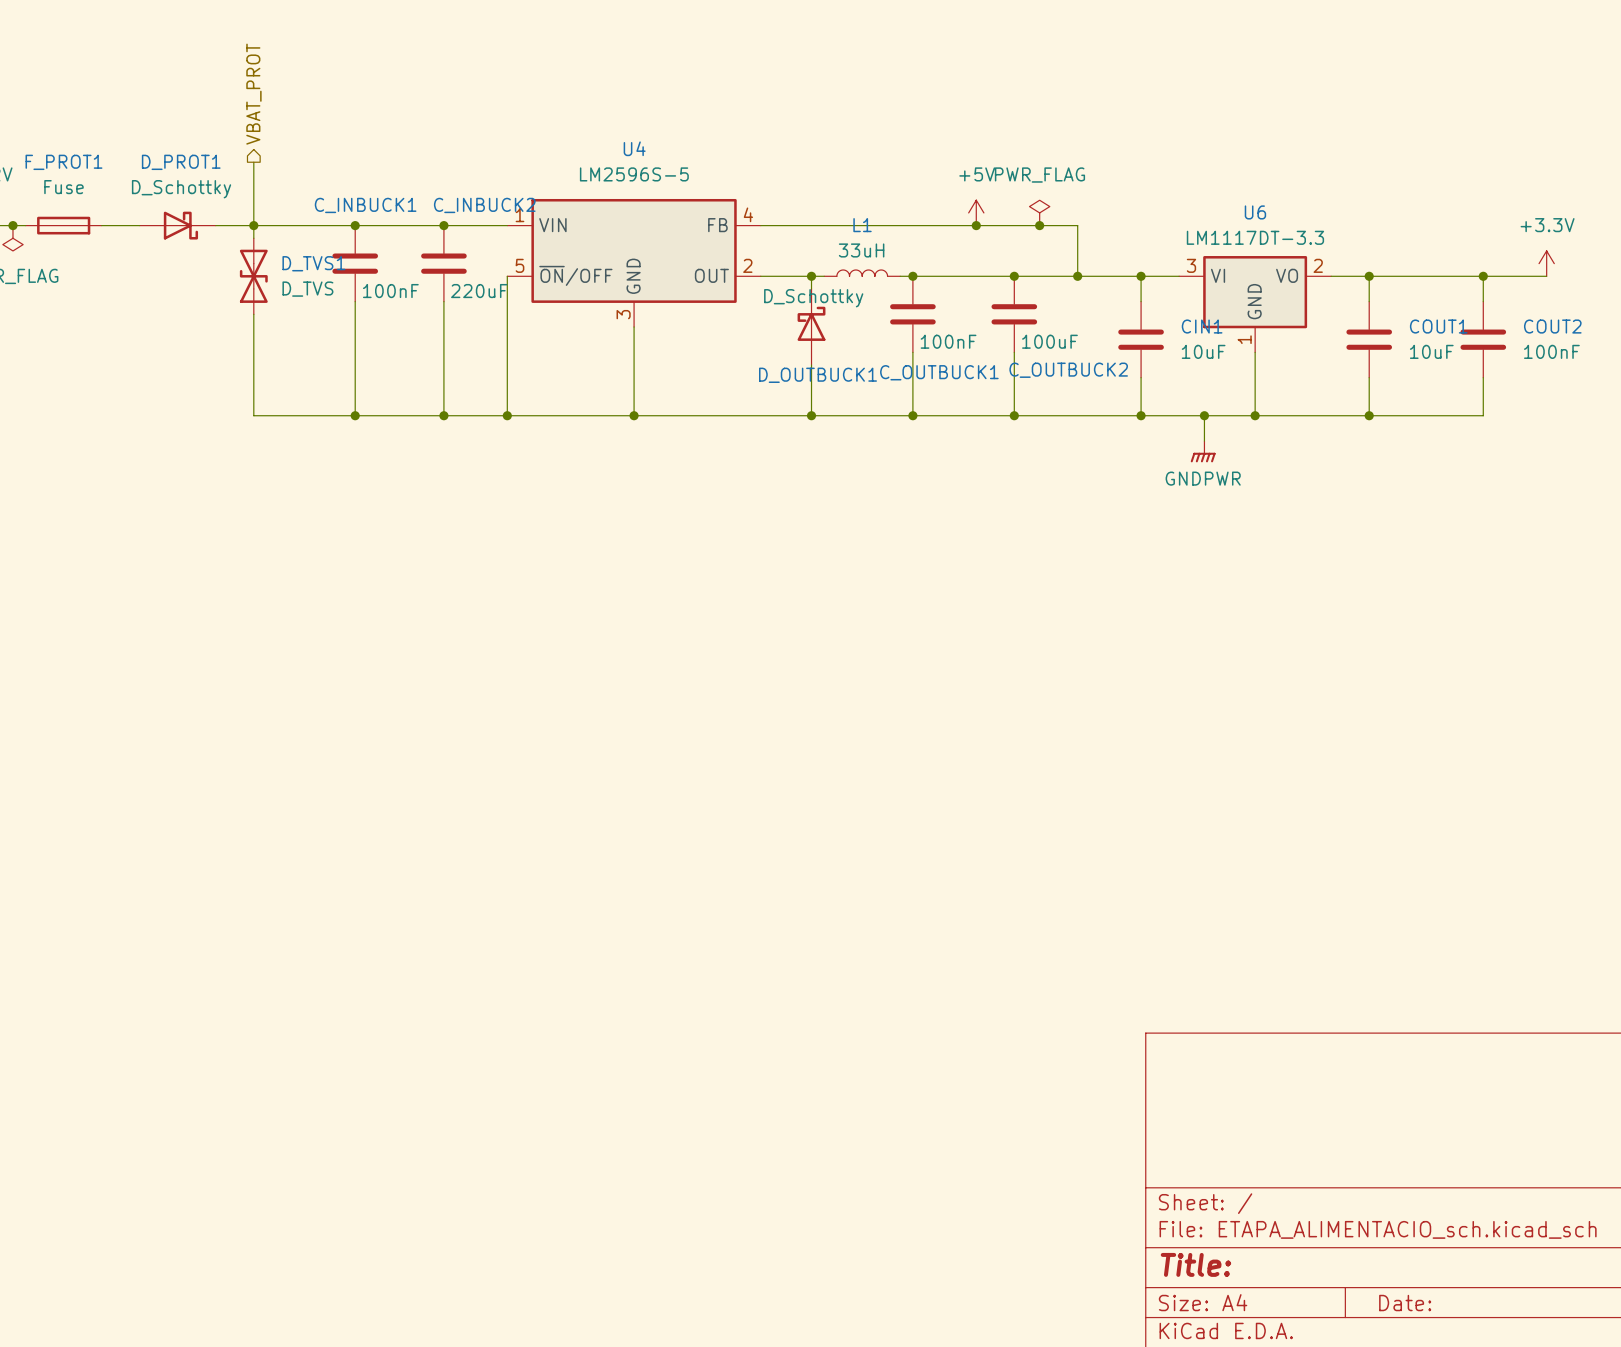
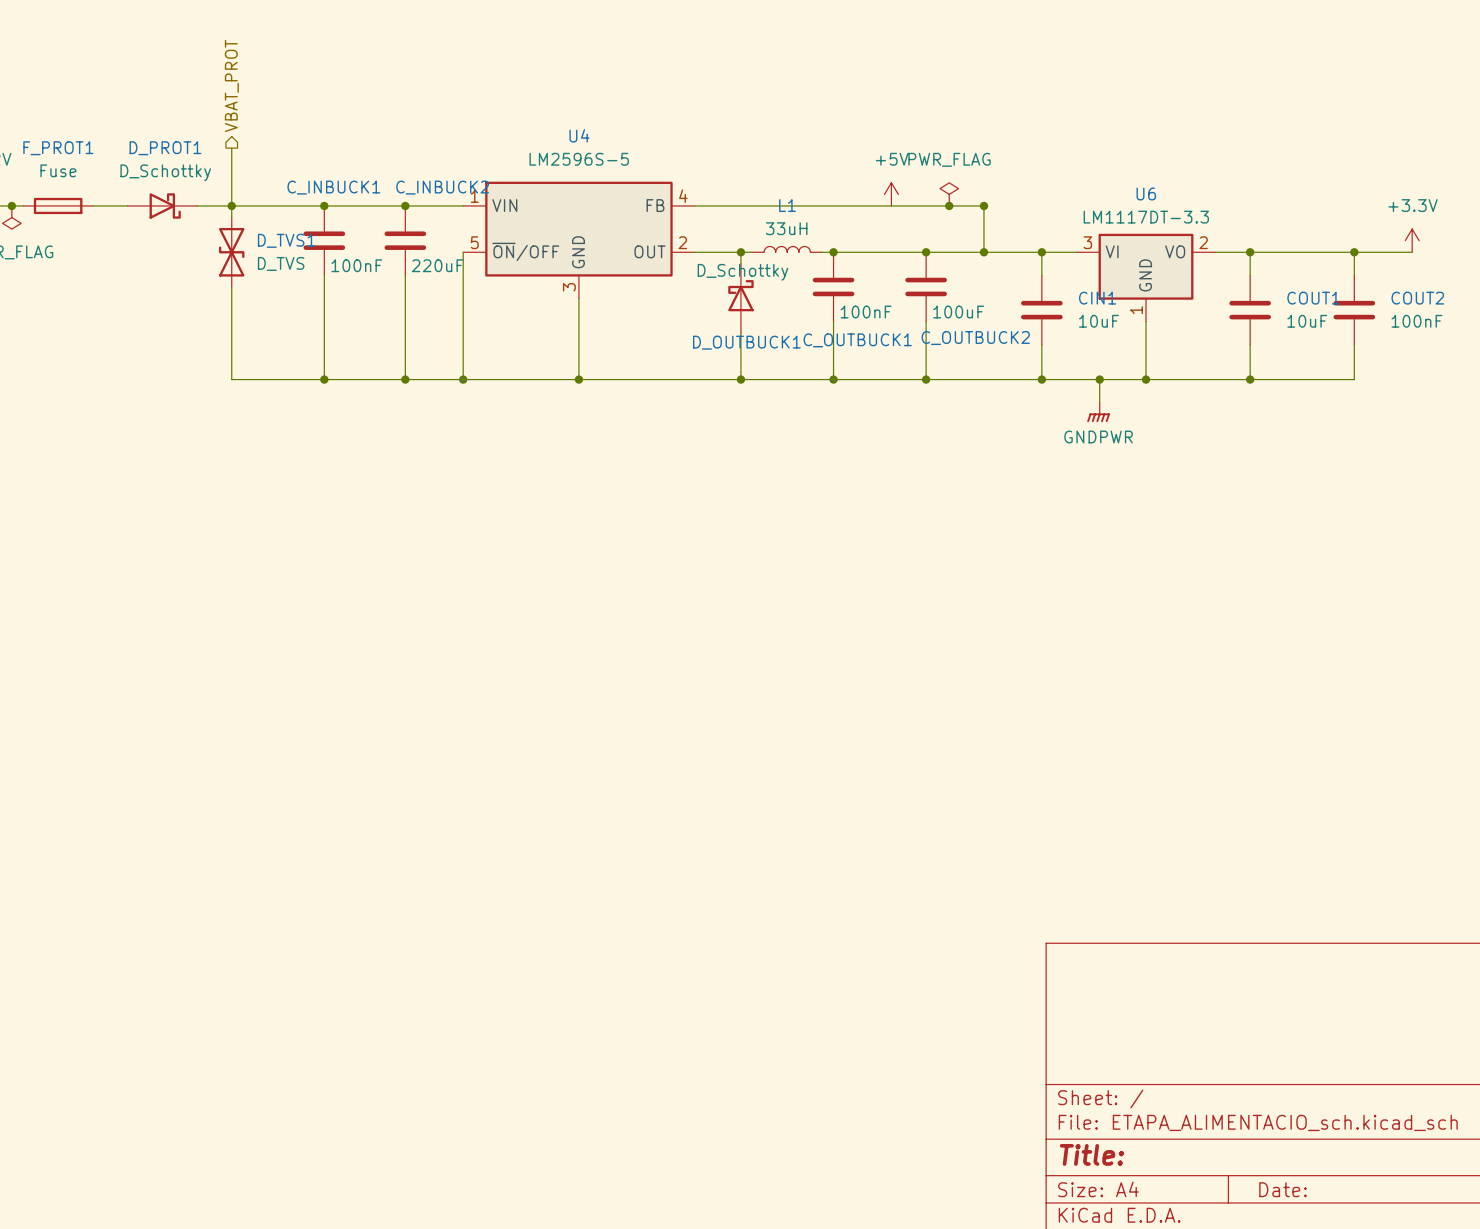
junction: (976, 225) -> none
junction: none -> (983, 205)

